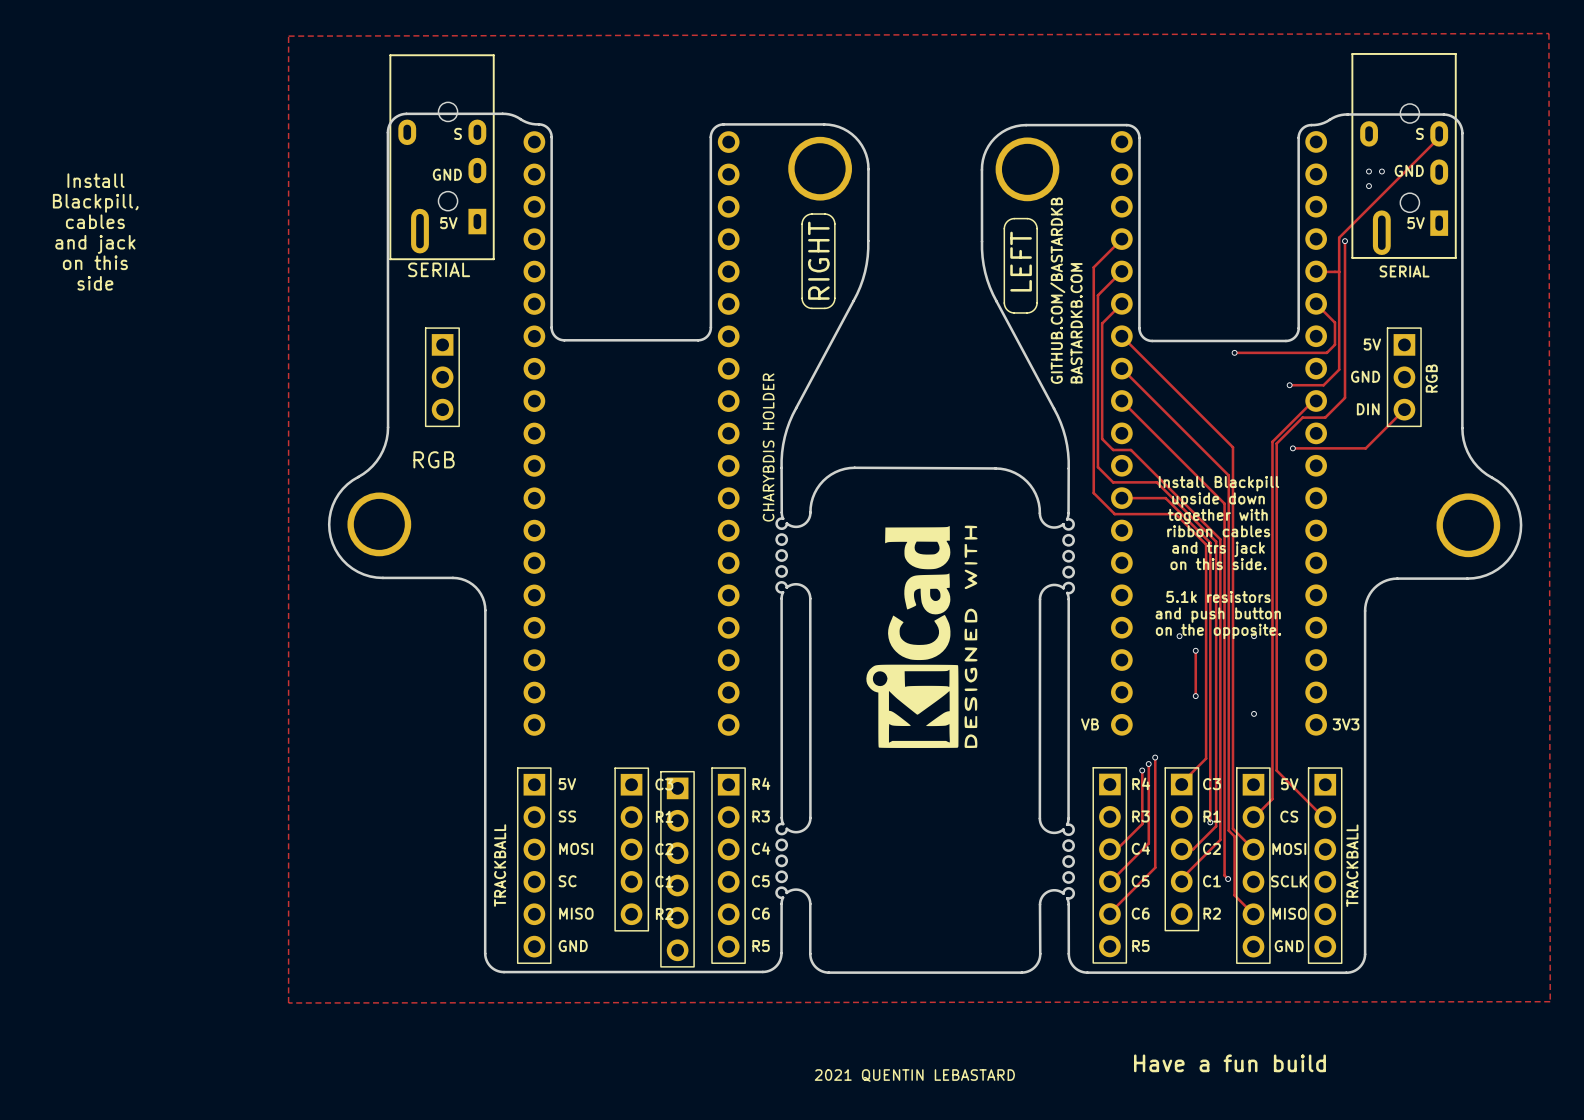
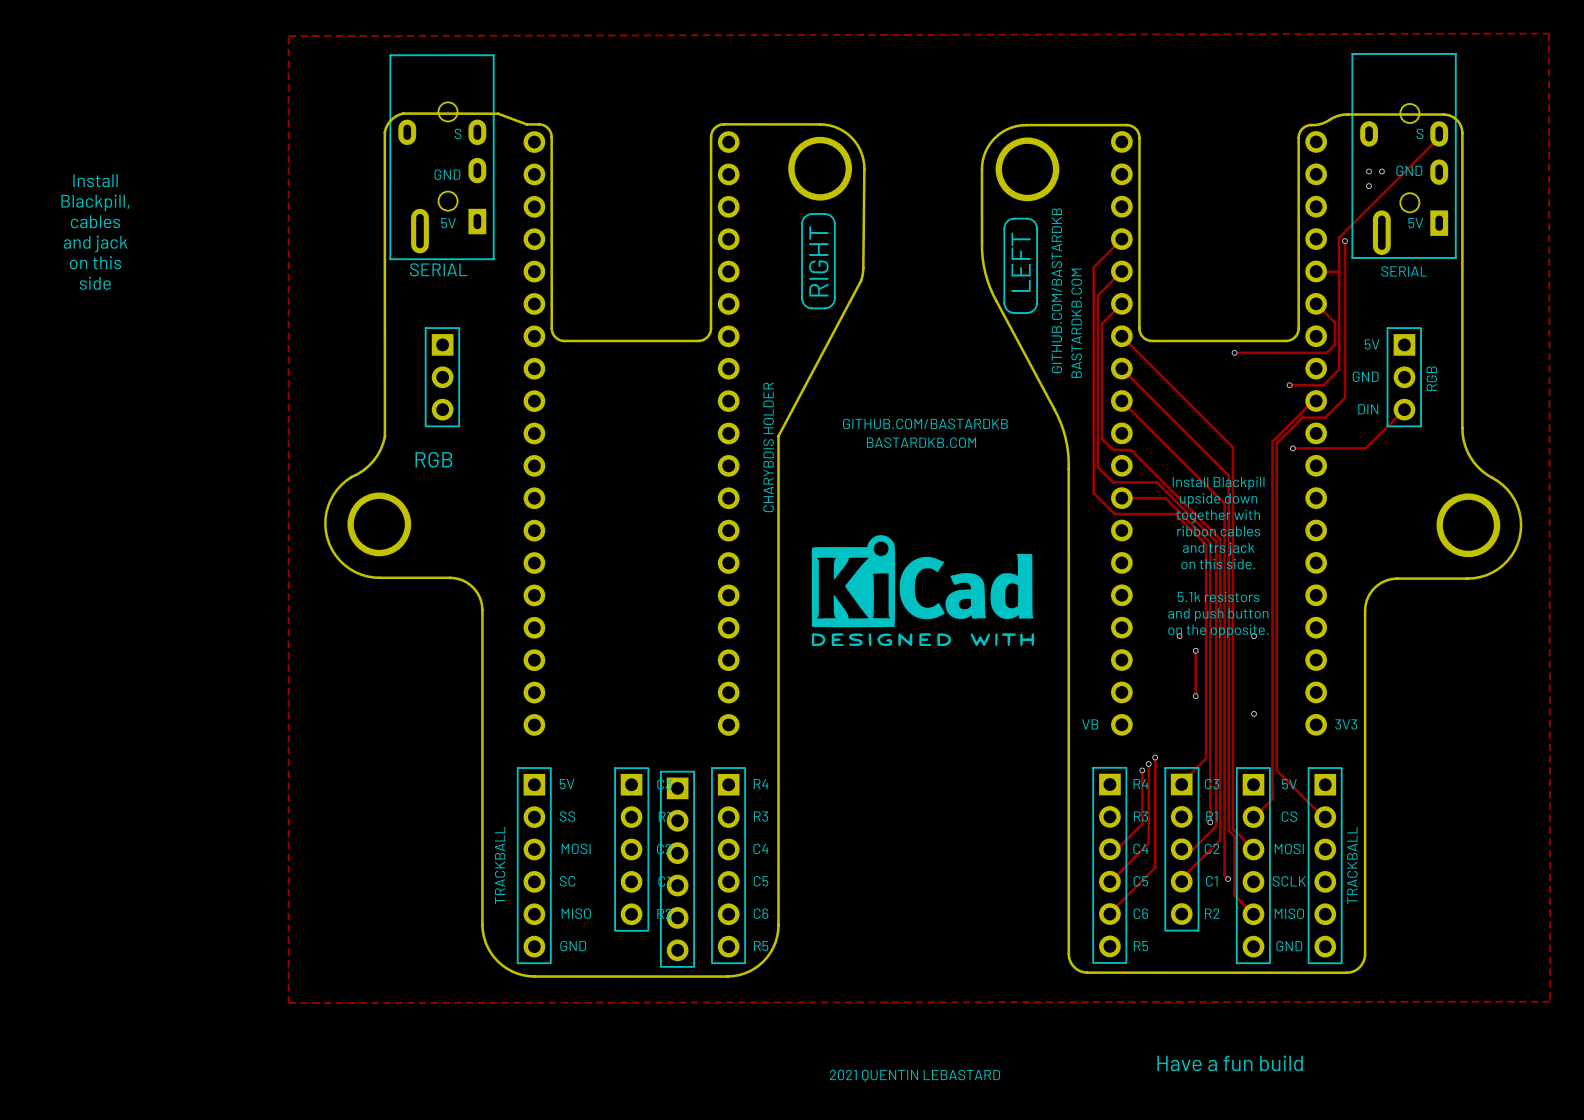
board edge: none -> (403, 113) (498, 113) (526, 124) (543, 125) (549, 130) (551, 137) (551, 329) (555, 337) (563, 340) (698, 340) (708, 336) (711, 328) (711, 137) (713, 130) (717, 126) (723, 124) (830, 125) (847, 134) (857, 145) (862, 154) (864, 169) (862, 277) (778, 436) (778, 930) (775, 941) (767, 957) (754, 968) (744, 973) (727, 976) (528, 976) (512, 971) (502, 965) (490, 952) (485, 942) (482, 925) (482, 610) (479, 597) (469, 584) (454, 578) (380, 577) (361, 574) (349, 568) (339, 560) (329, 544) (325, 531) (326, 512) (333, 494) (346, 480) (363, 470) (373, 461) (380, 449) (384, 436) (384, 132) (391, 120) (403, 113)
text: none -> GITHUB.COM/BASTARDKB (925, 423)
text: none -> BASTARDKB.COM (921, 442)
board edge: (1068, 468) (1067, 519) (1071, 520) (1073, 524) (1069, 529) (1065, 528) (1063, 524) (1055, 527) (1045, 524) (1040, 516) (1035, 493) (1027, 481) (1010, 470) (995, 468) (844, 468) (831, 474) (819, 484) (812, 497) (809, 516) (805, 523) (795, 526) (786, 523) (782, 528) (777, 526) (777, 520) (783, 518) (781, 460) (786, 429) (796, 407) (857, 293) (866, 264) (868, 248) (867, 159) (858, 141) (843, 128) (824, 124) (723, 124) (717, 126) (712, 130) (710, 137) (710, 327) (705, 337) (698, 340) (564, 340) (556, 337) (551, 329) (551, 137) (549, 129) (543, 125) (529, 123) (505, 113) (403, 114) (395, 117) (390, 123) (387, 132) (387, 433) (385, 445) (376, 461) (368, 470) (347, 484) (335, 499) (329, 517) (329, 530) (332, 543) (338, 554) (352, 568) (363, 574) (382, 577) (457, 578) (472, 584) (482, 597) (485, 610) (485, 953) (489, 965) (495, 970) (504, 972) (767, 971) (776, 966) (781, 957) (783, 897) (778, 896) (776, 892) (781, 887) (785, 888) (786, 892) (793, 889) (800, 890) (808, 897) (810, 903) (810, 957) (815, 967) (822, 971) (1023, 972) (1033, 968) (1039, 957) (1040, 904) (1041, 897) (1049, 890) (1057, 890) (1063, 893) (1065, 889) (1068, 888) (1073, 893) (1072, 897) (1067, 898) (1069, 958) (1075, 968) (1087, 972) -> (1068, 468) (1068, 953) (1074, 967) (1087, 972)
drawing: [866, 525, 978, 749] -> none
round board edge: [775, 533, 789, 546] -> none
round board edge: [1062, 533, 1075, 547] -> none
drawing: none -> [811, 535, 1035, 647]
round board edge: [775, 549, 789, 562] -> none
round board edge: [1062, 549, 1076, 563] -> none
round board edge: [775, 565, 789, 578] -> none
round board edge: [1062, 565, 1076, 579] -> none
board edge: (786, 587) (785, 584) (781, 582) (776, 587) (778, 591) (783, 592) (783, 824) (778, 825) (776, 829) (781, 834) (785, 832) (786, 828) (795, 832) (803, 830) (808, 824) (810, 817) (810, 596) (807, 590) (802, 585) (794, 584) (786, 587) -> none
board edge: (1063, 588) (1057, 585) (1049, 585) (1043, 589) (1040, 597) (1039, 818) (1041, 825) (1046, 830) (1055, 832) (1063, 829) (1064, 833) (1068, 834) (1073, 829) (1071, 825) (1067, 824) (1067, 592) (1072, 591) (1073, 587) (1068, 582) (1065, 584) (1063, 588) -> none
round board edge: [775, 838, 789, 852] -> none
round board edge: [1062, 839, 1075, 852] -> none
round board edge: [775, 854, 789, 868] -> none
round board edge: [1062, 855, 1076, 868] -> none
round board edge: [775, 870, 789, 884] -> none
round board edge: [1062, 871, 1076, 884] -> none

